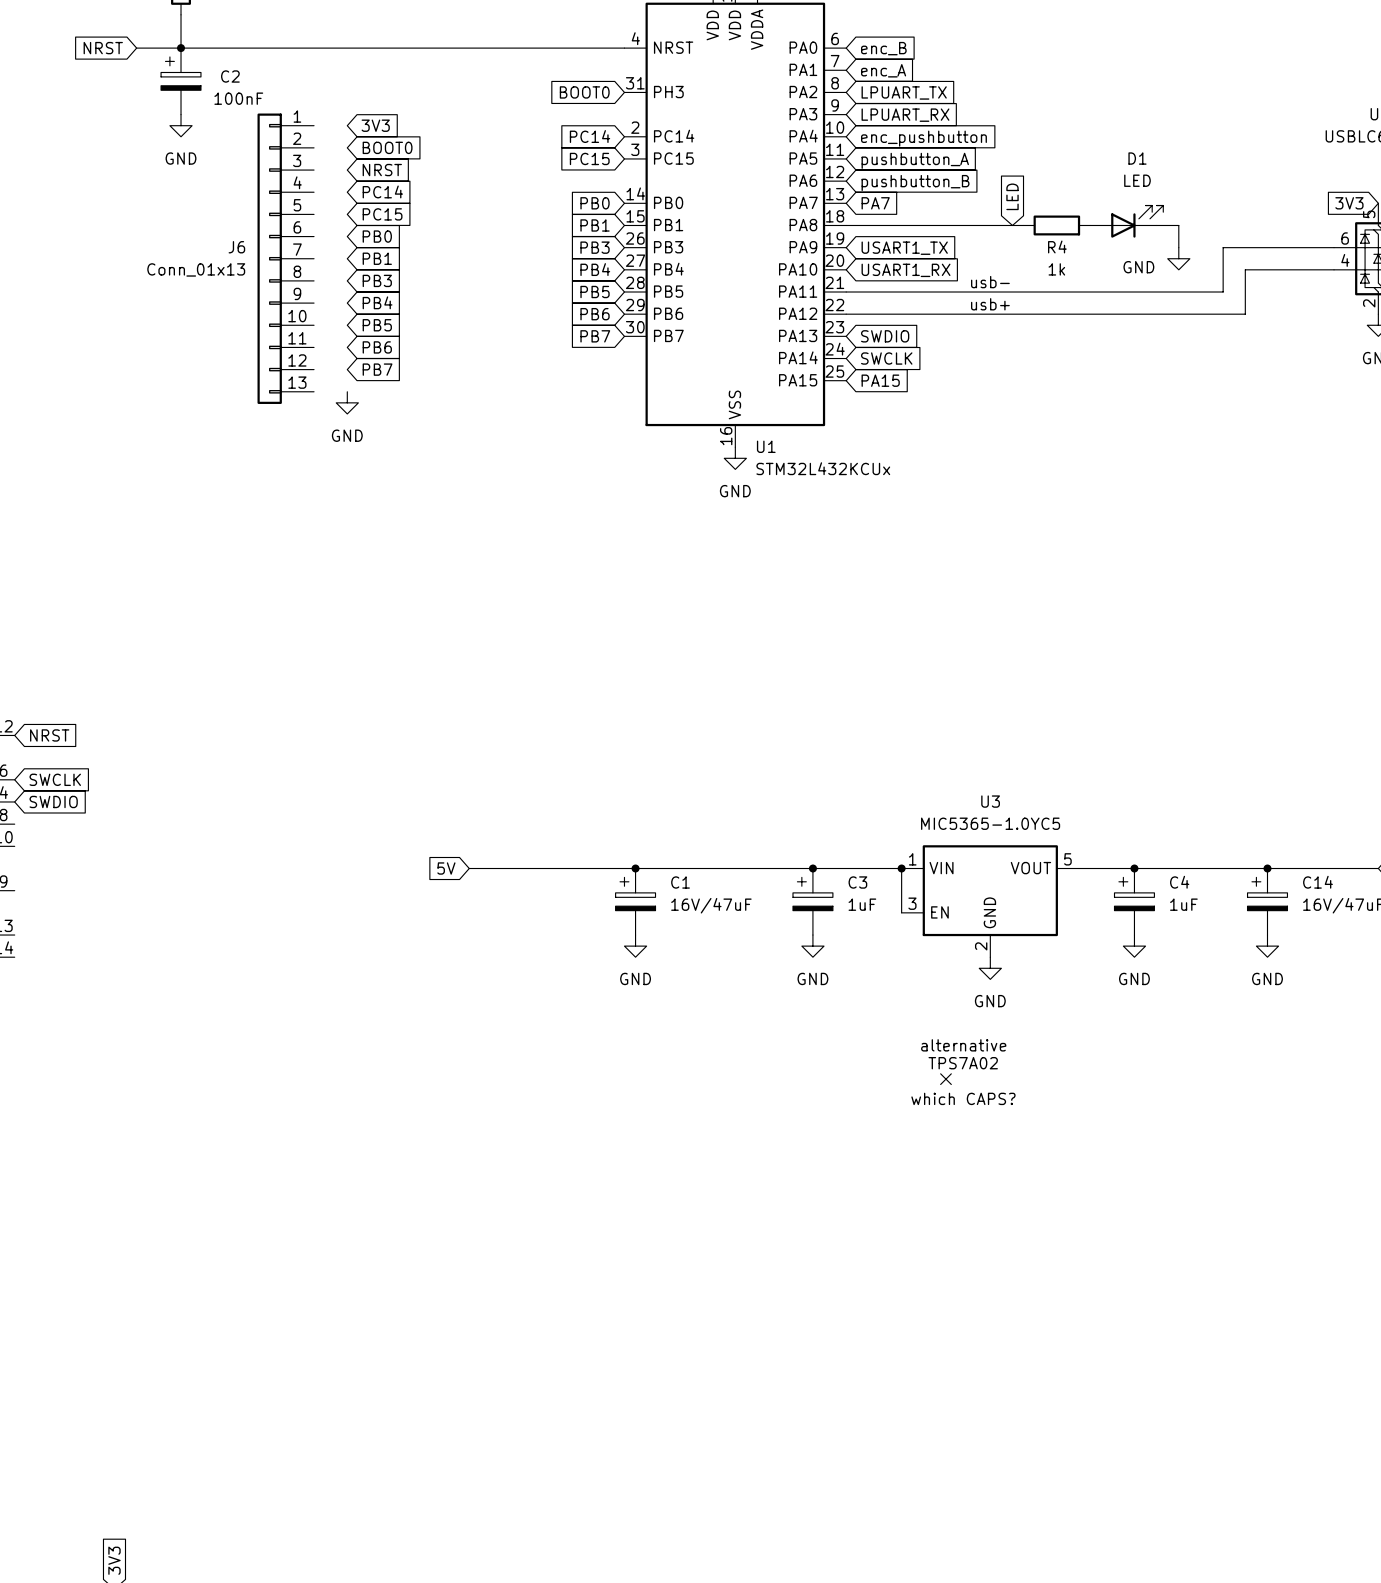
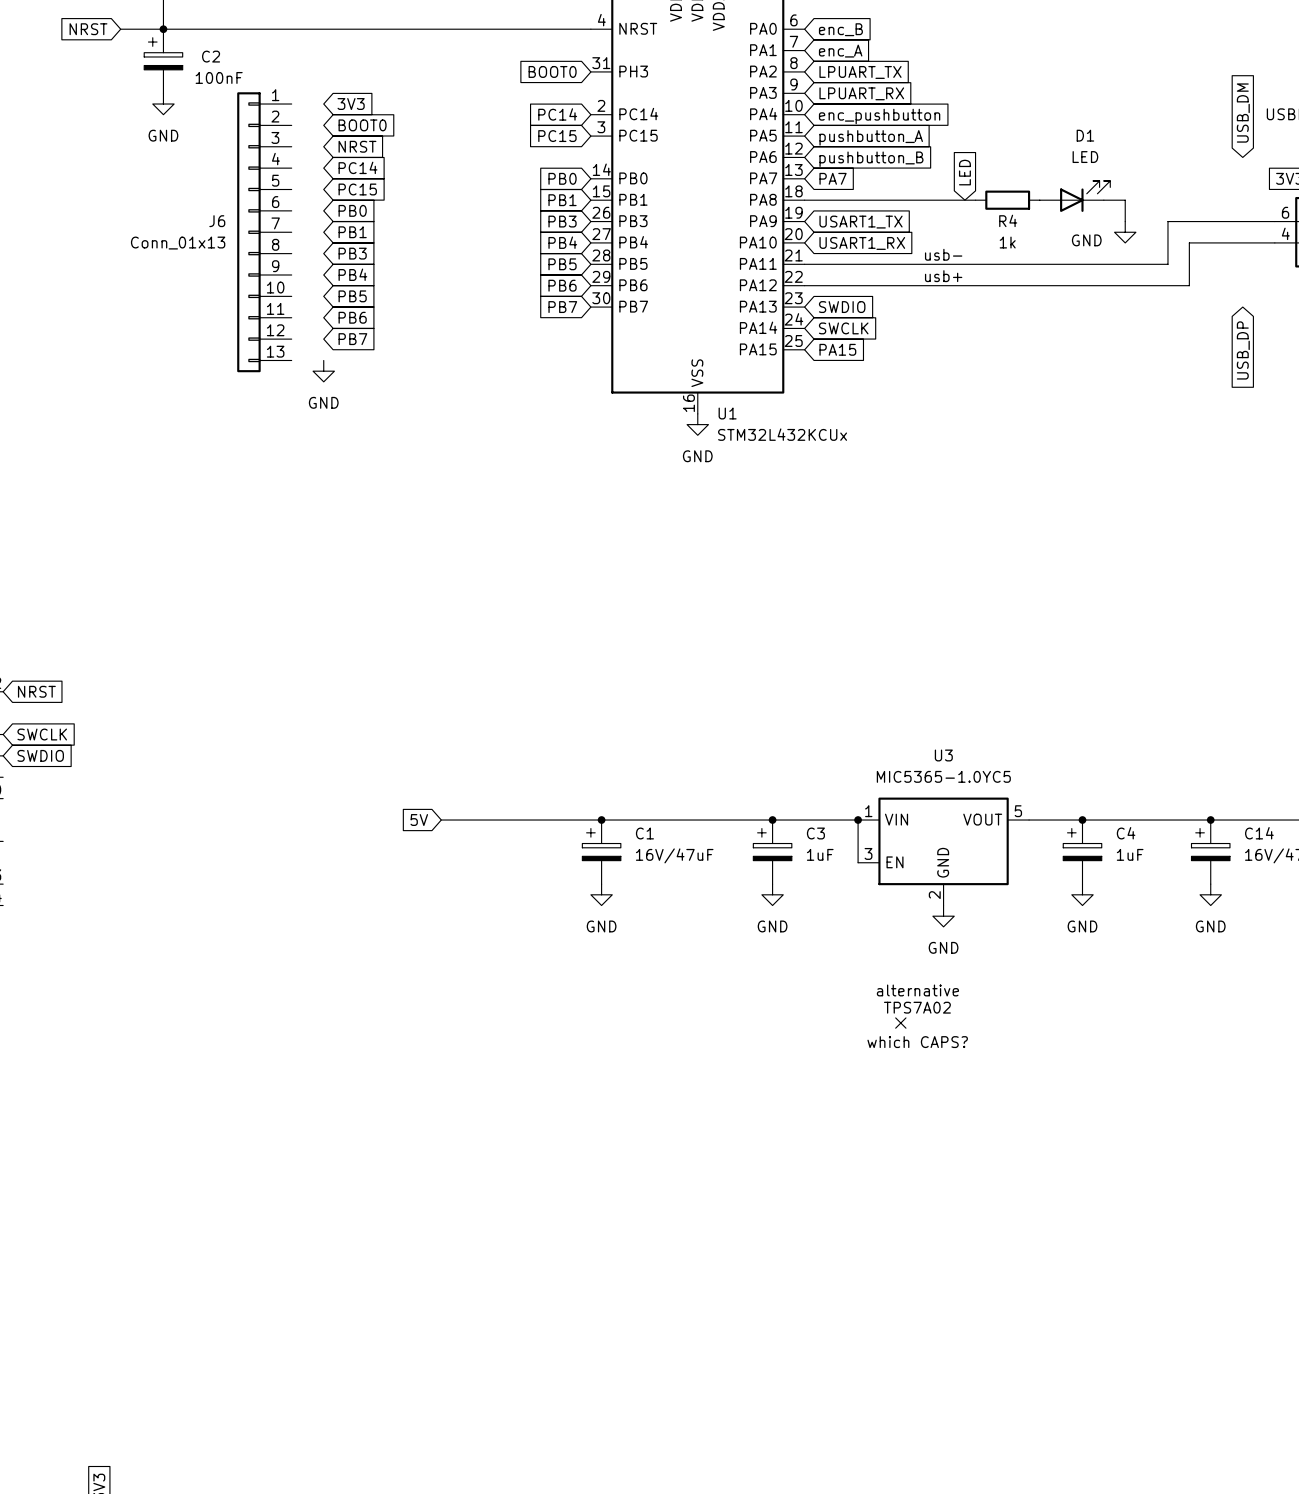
global label: none -> USB_DM (1243, 113)
global label: none -> USB_DP (1243, 350)

